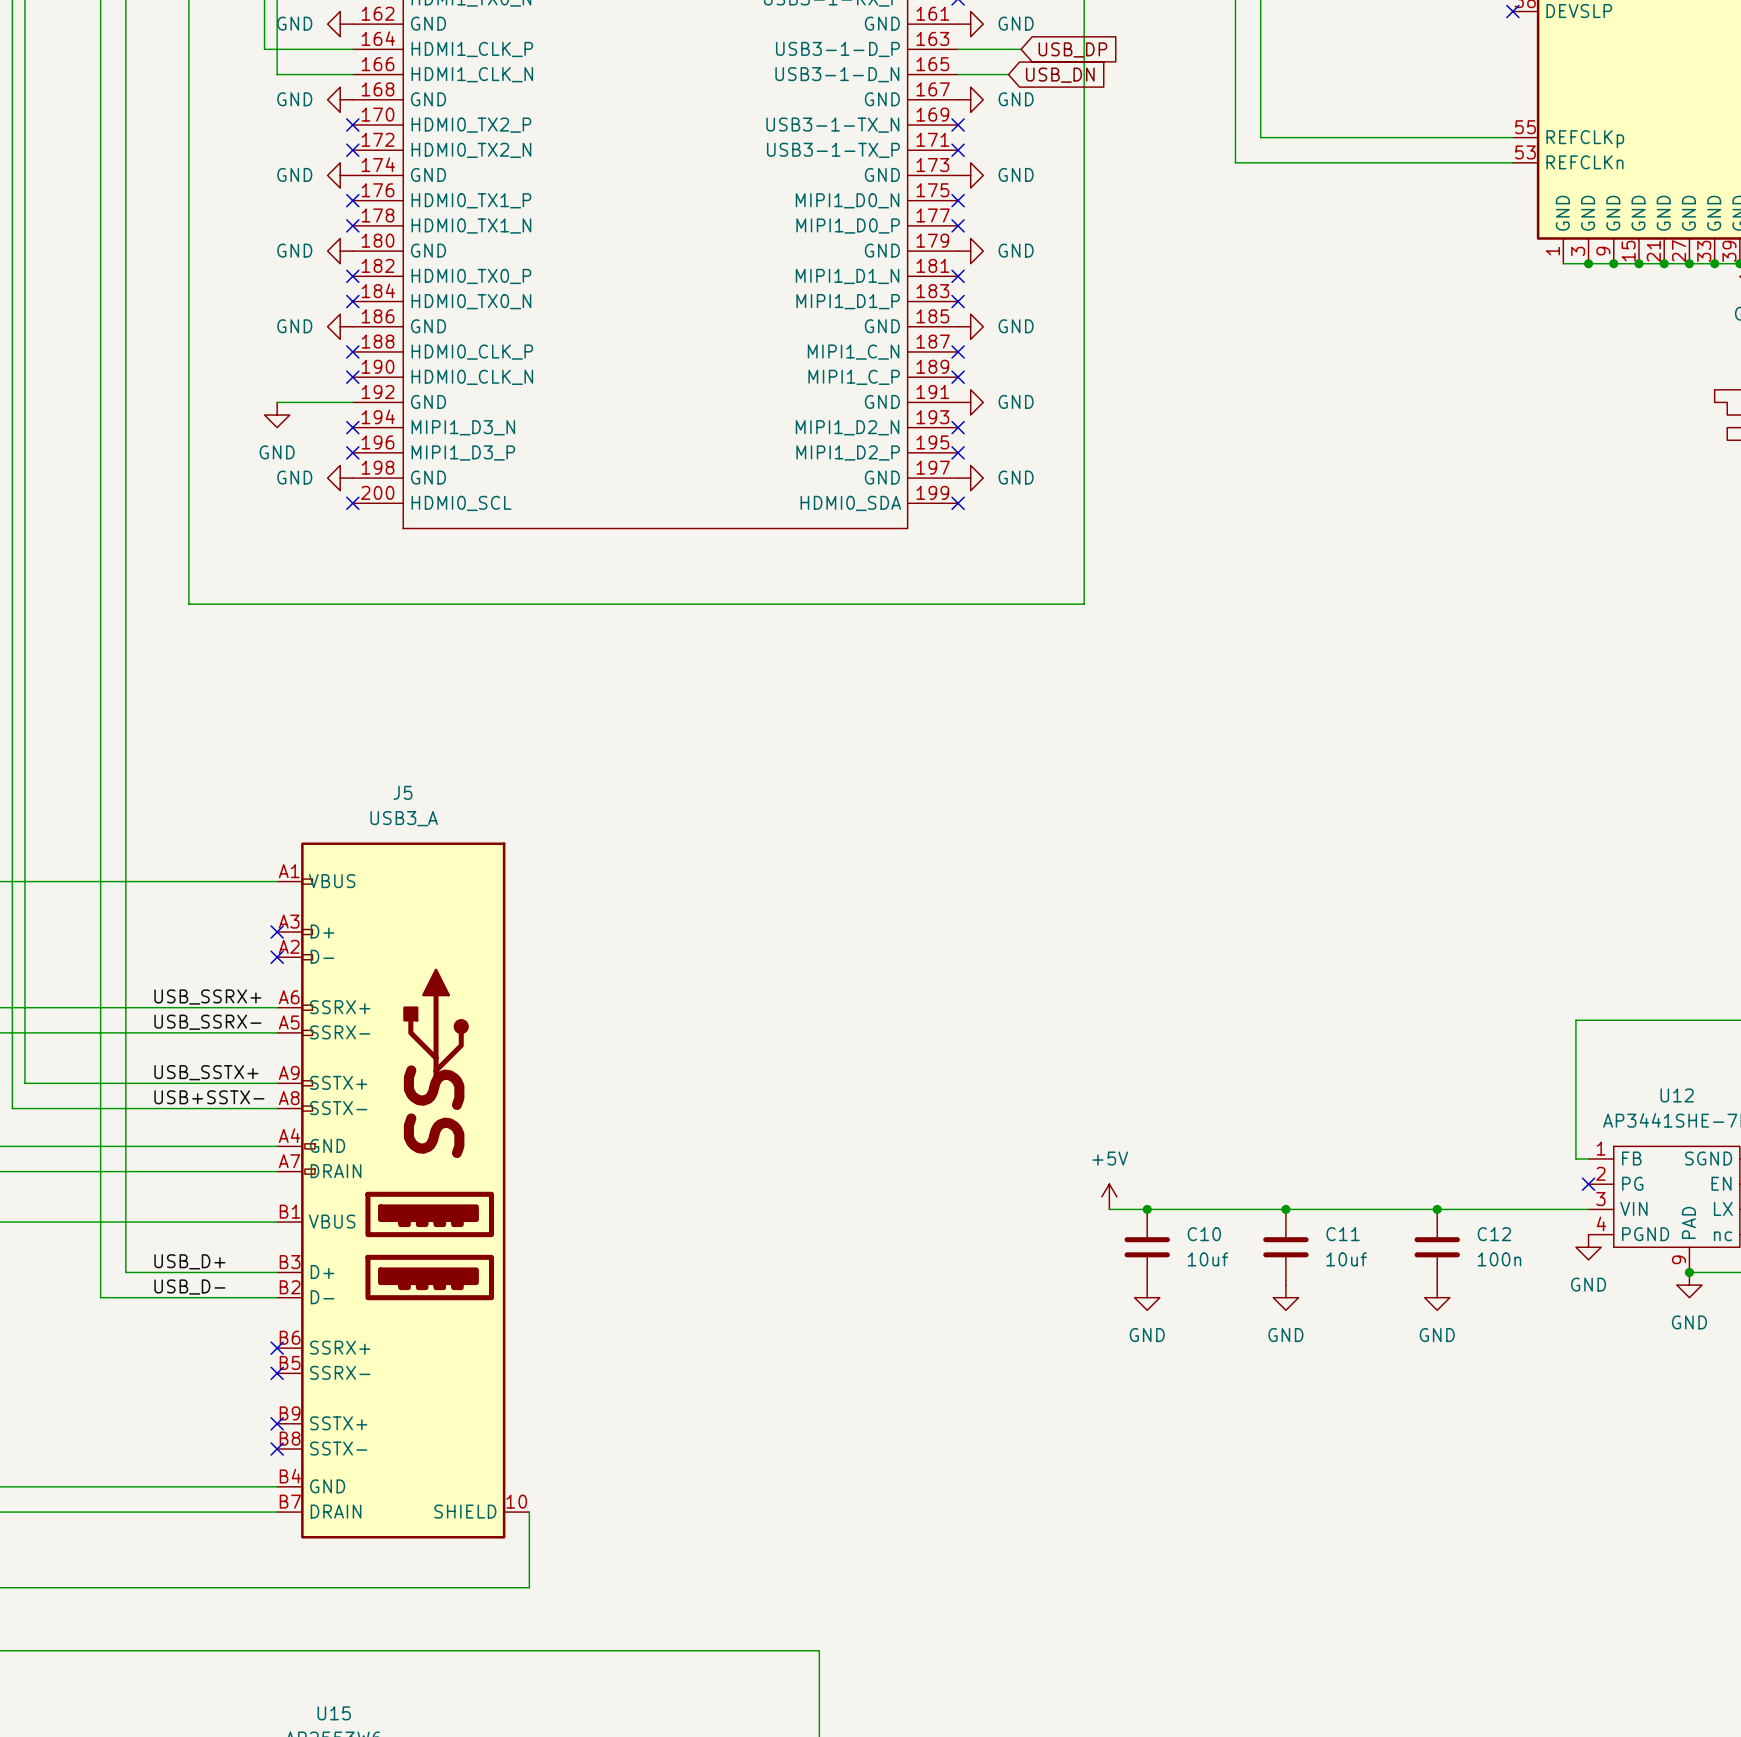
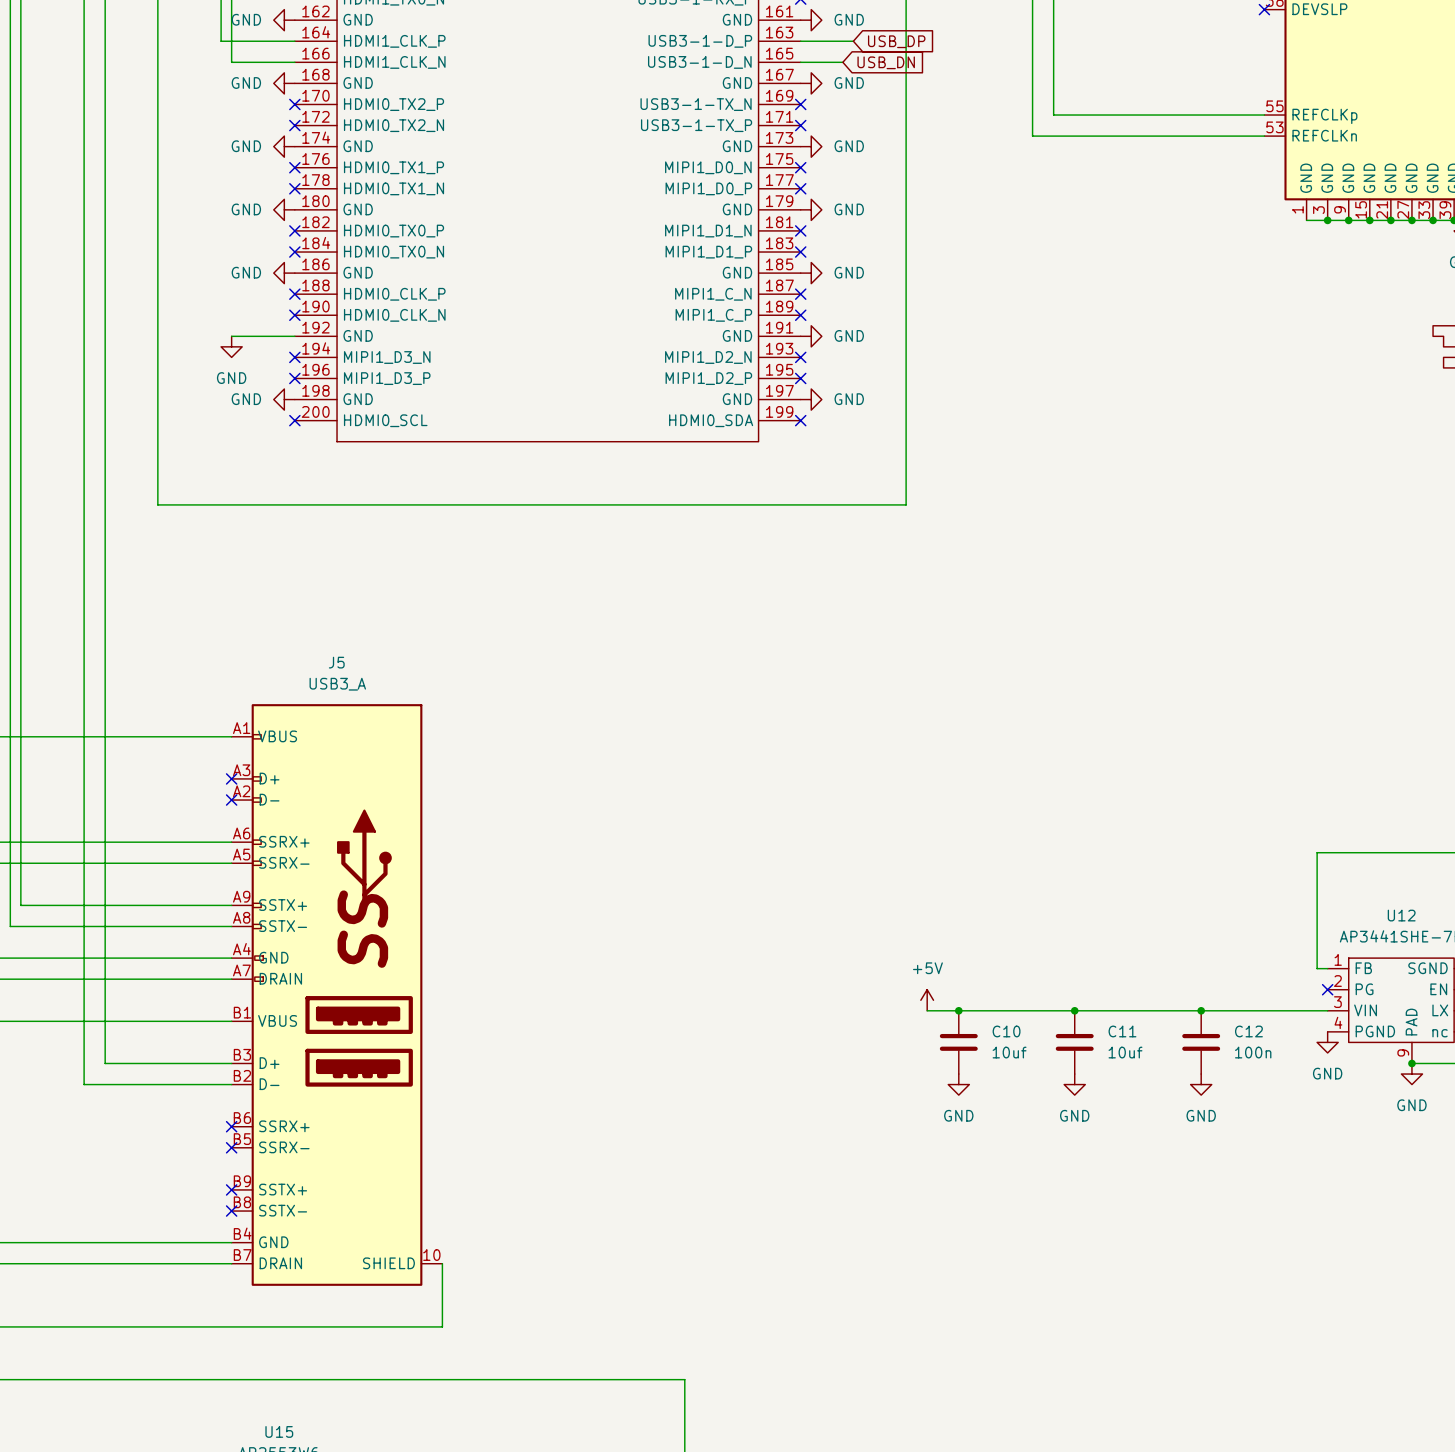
label: USB_SSRX+ (207, 997) -> none
label: USB_SSRX- (207, 1022) -> none
label: USB_SSTX+ (206, 1072) -> none
label: USB+SSTX- (209, 1097) -> none
label: USB_D+ (189, 1261) -> none
label: USB_D- (189, 1287) -> none

